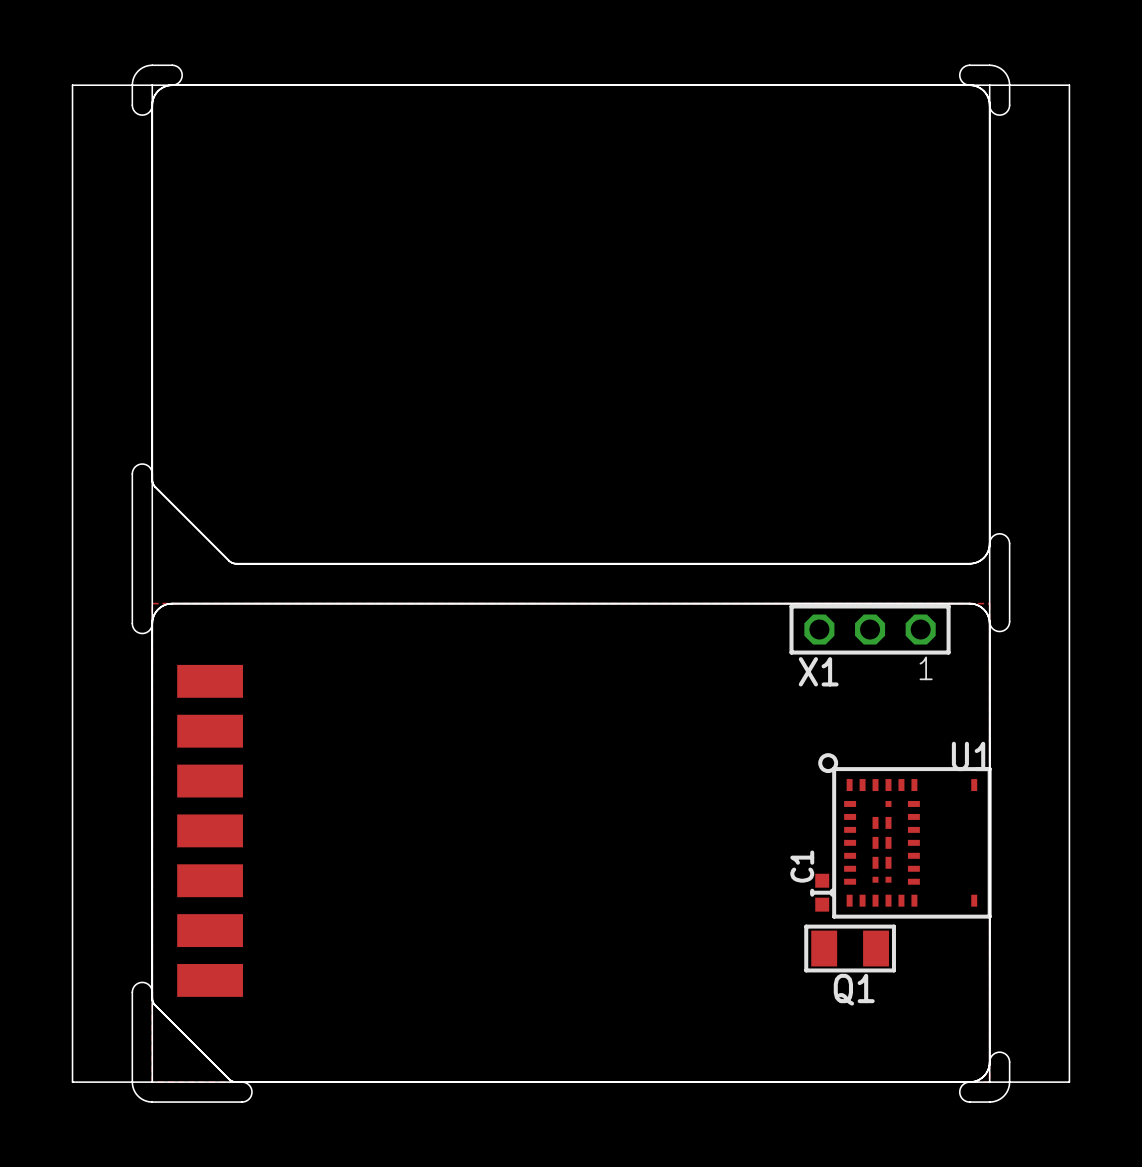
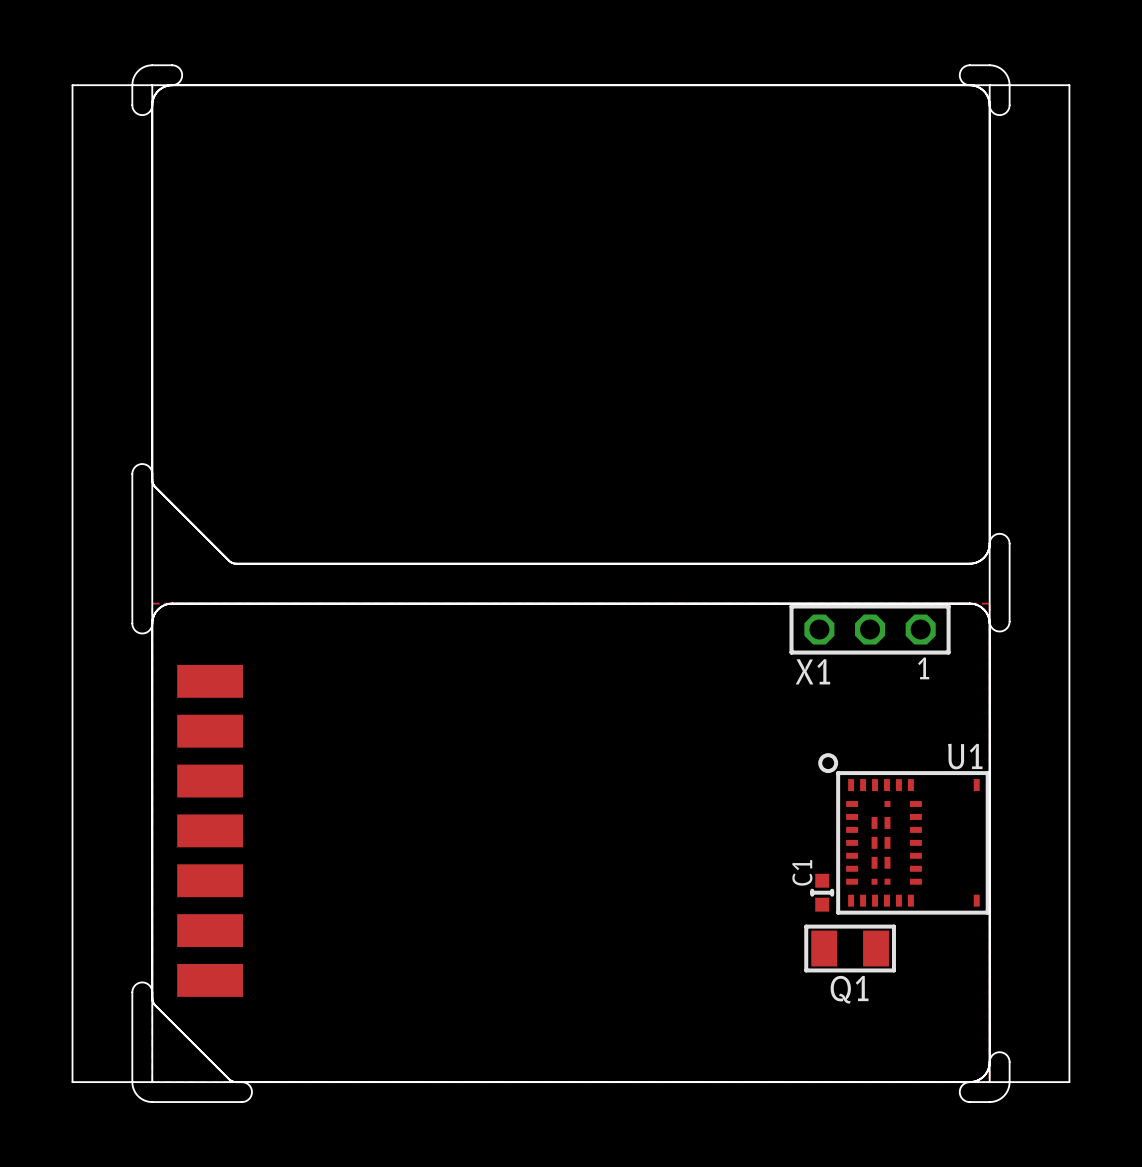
U1 footprint: [818, 753, 992, 919] -> [818, 753, 990, 915]

